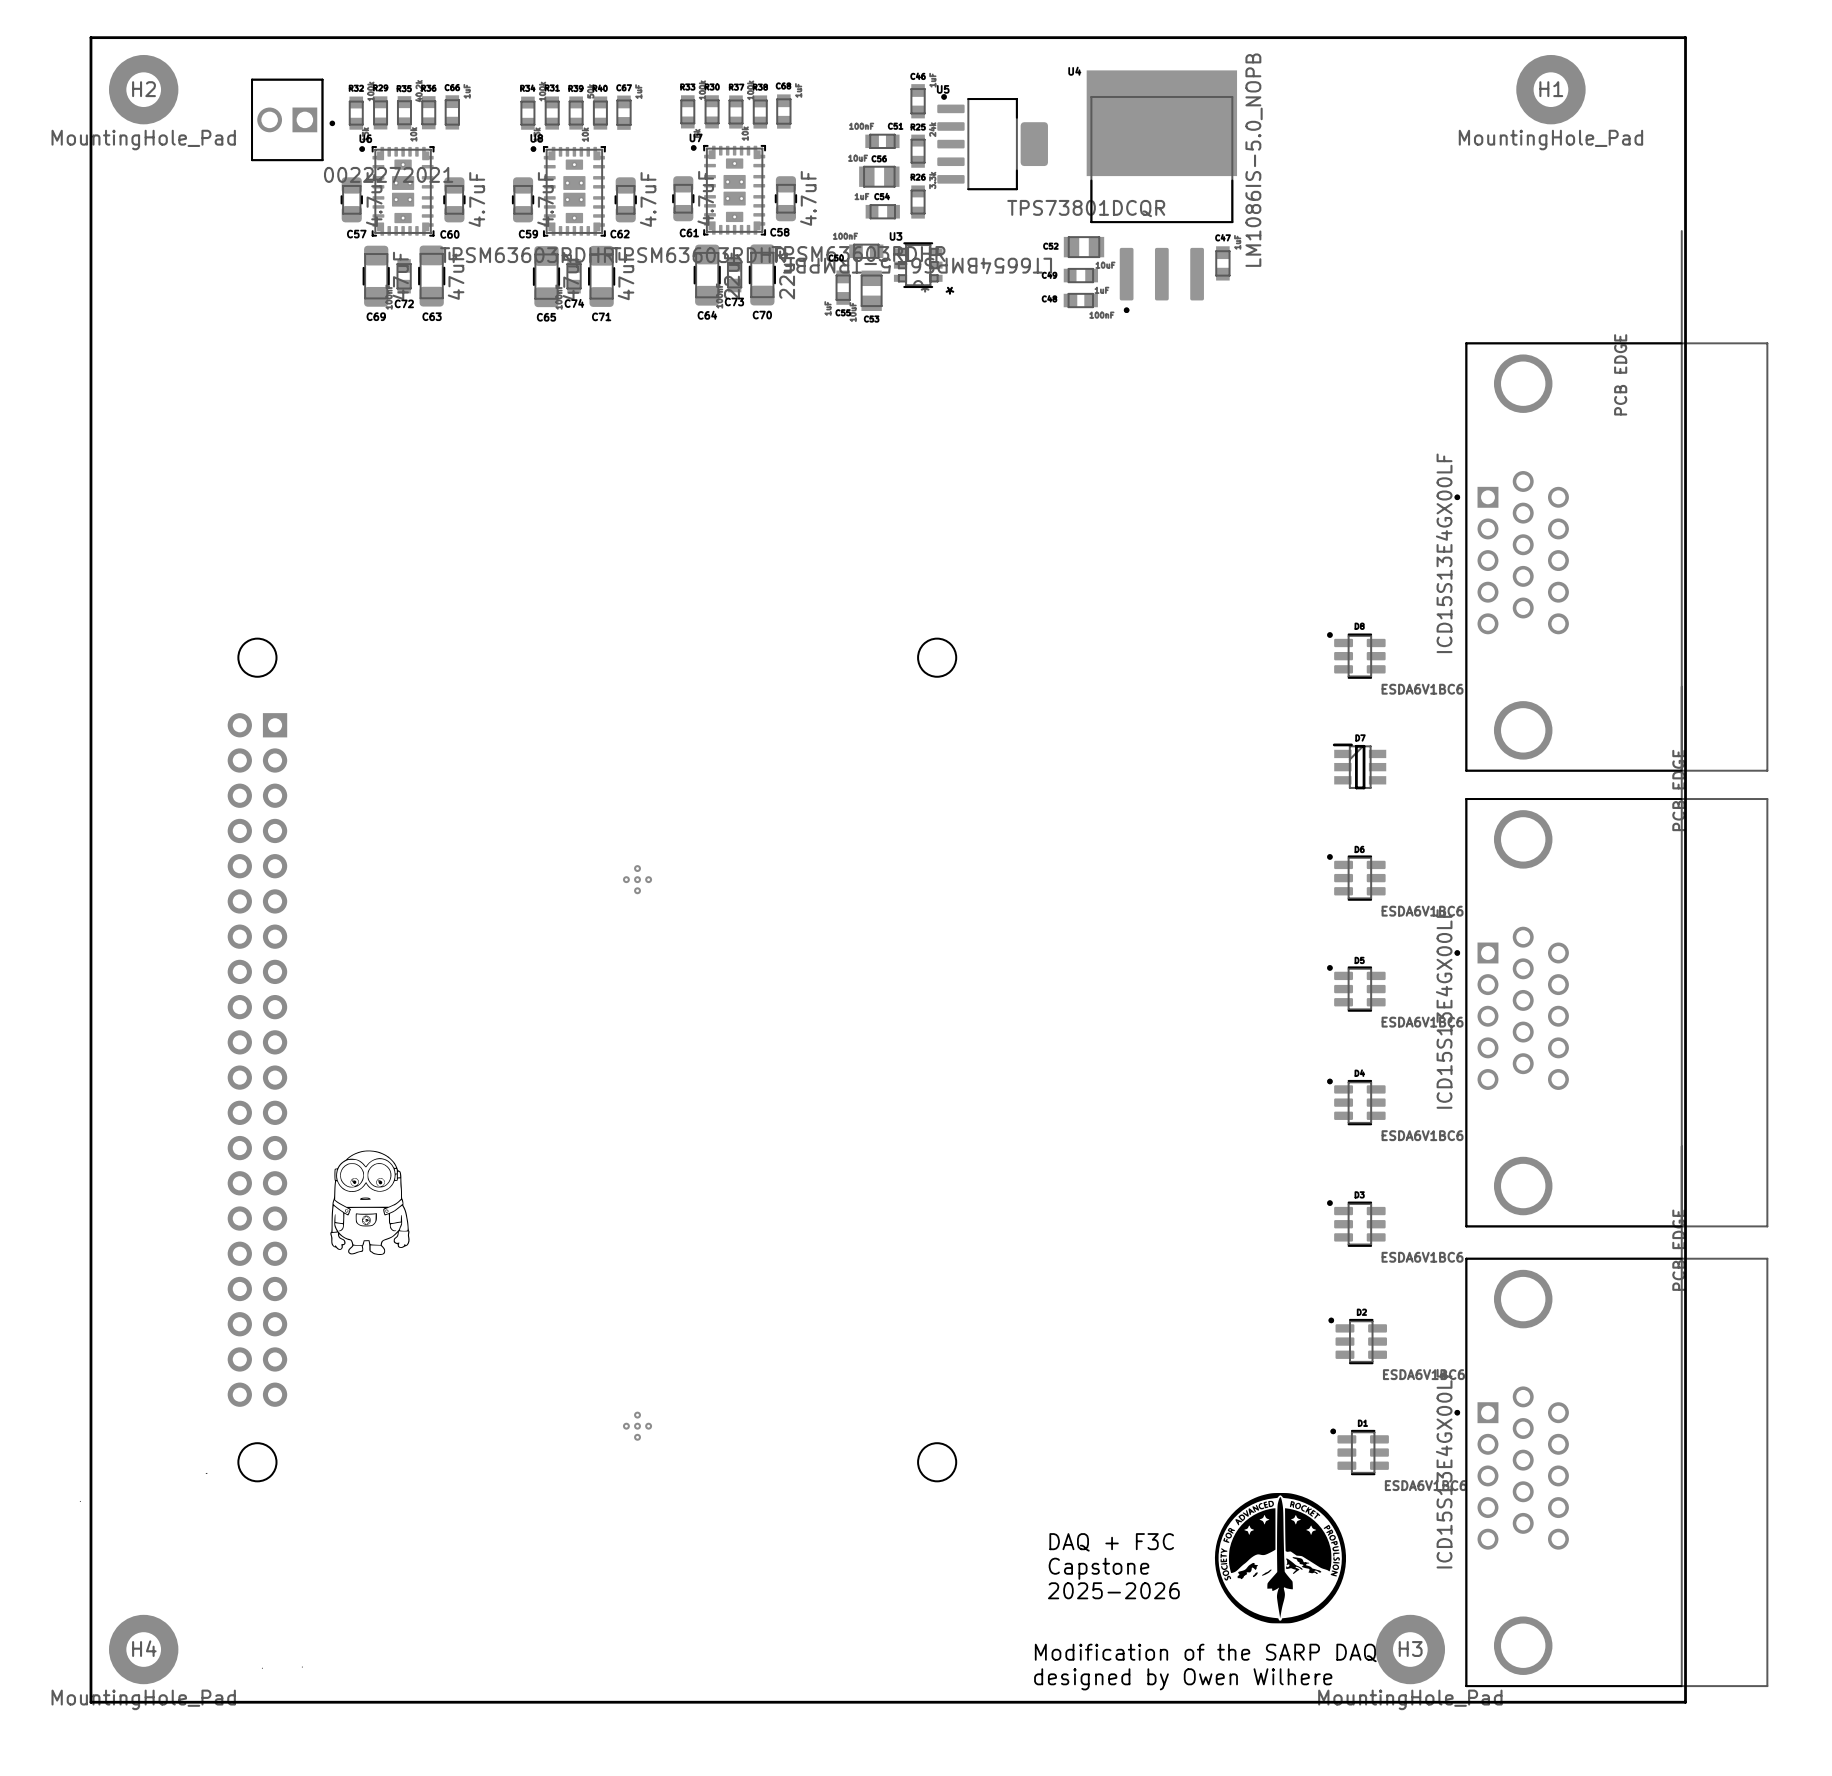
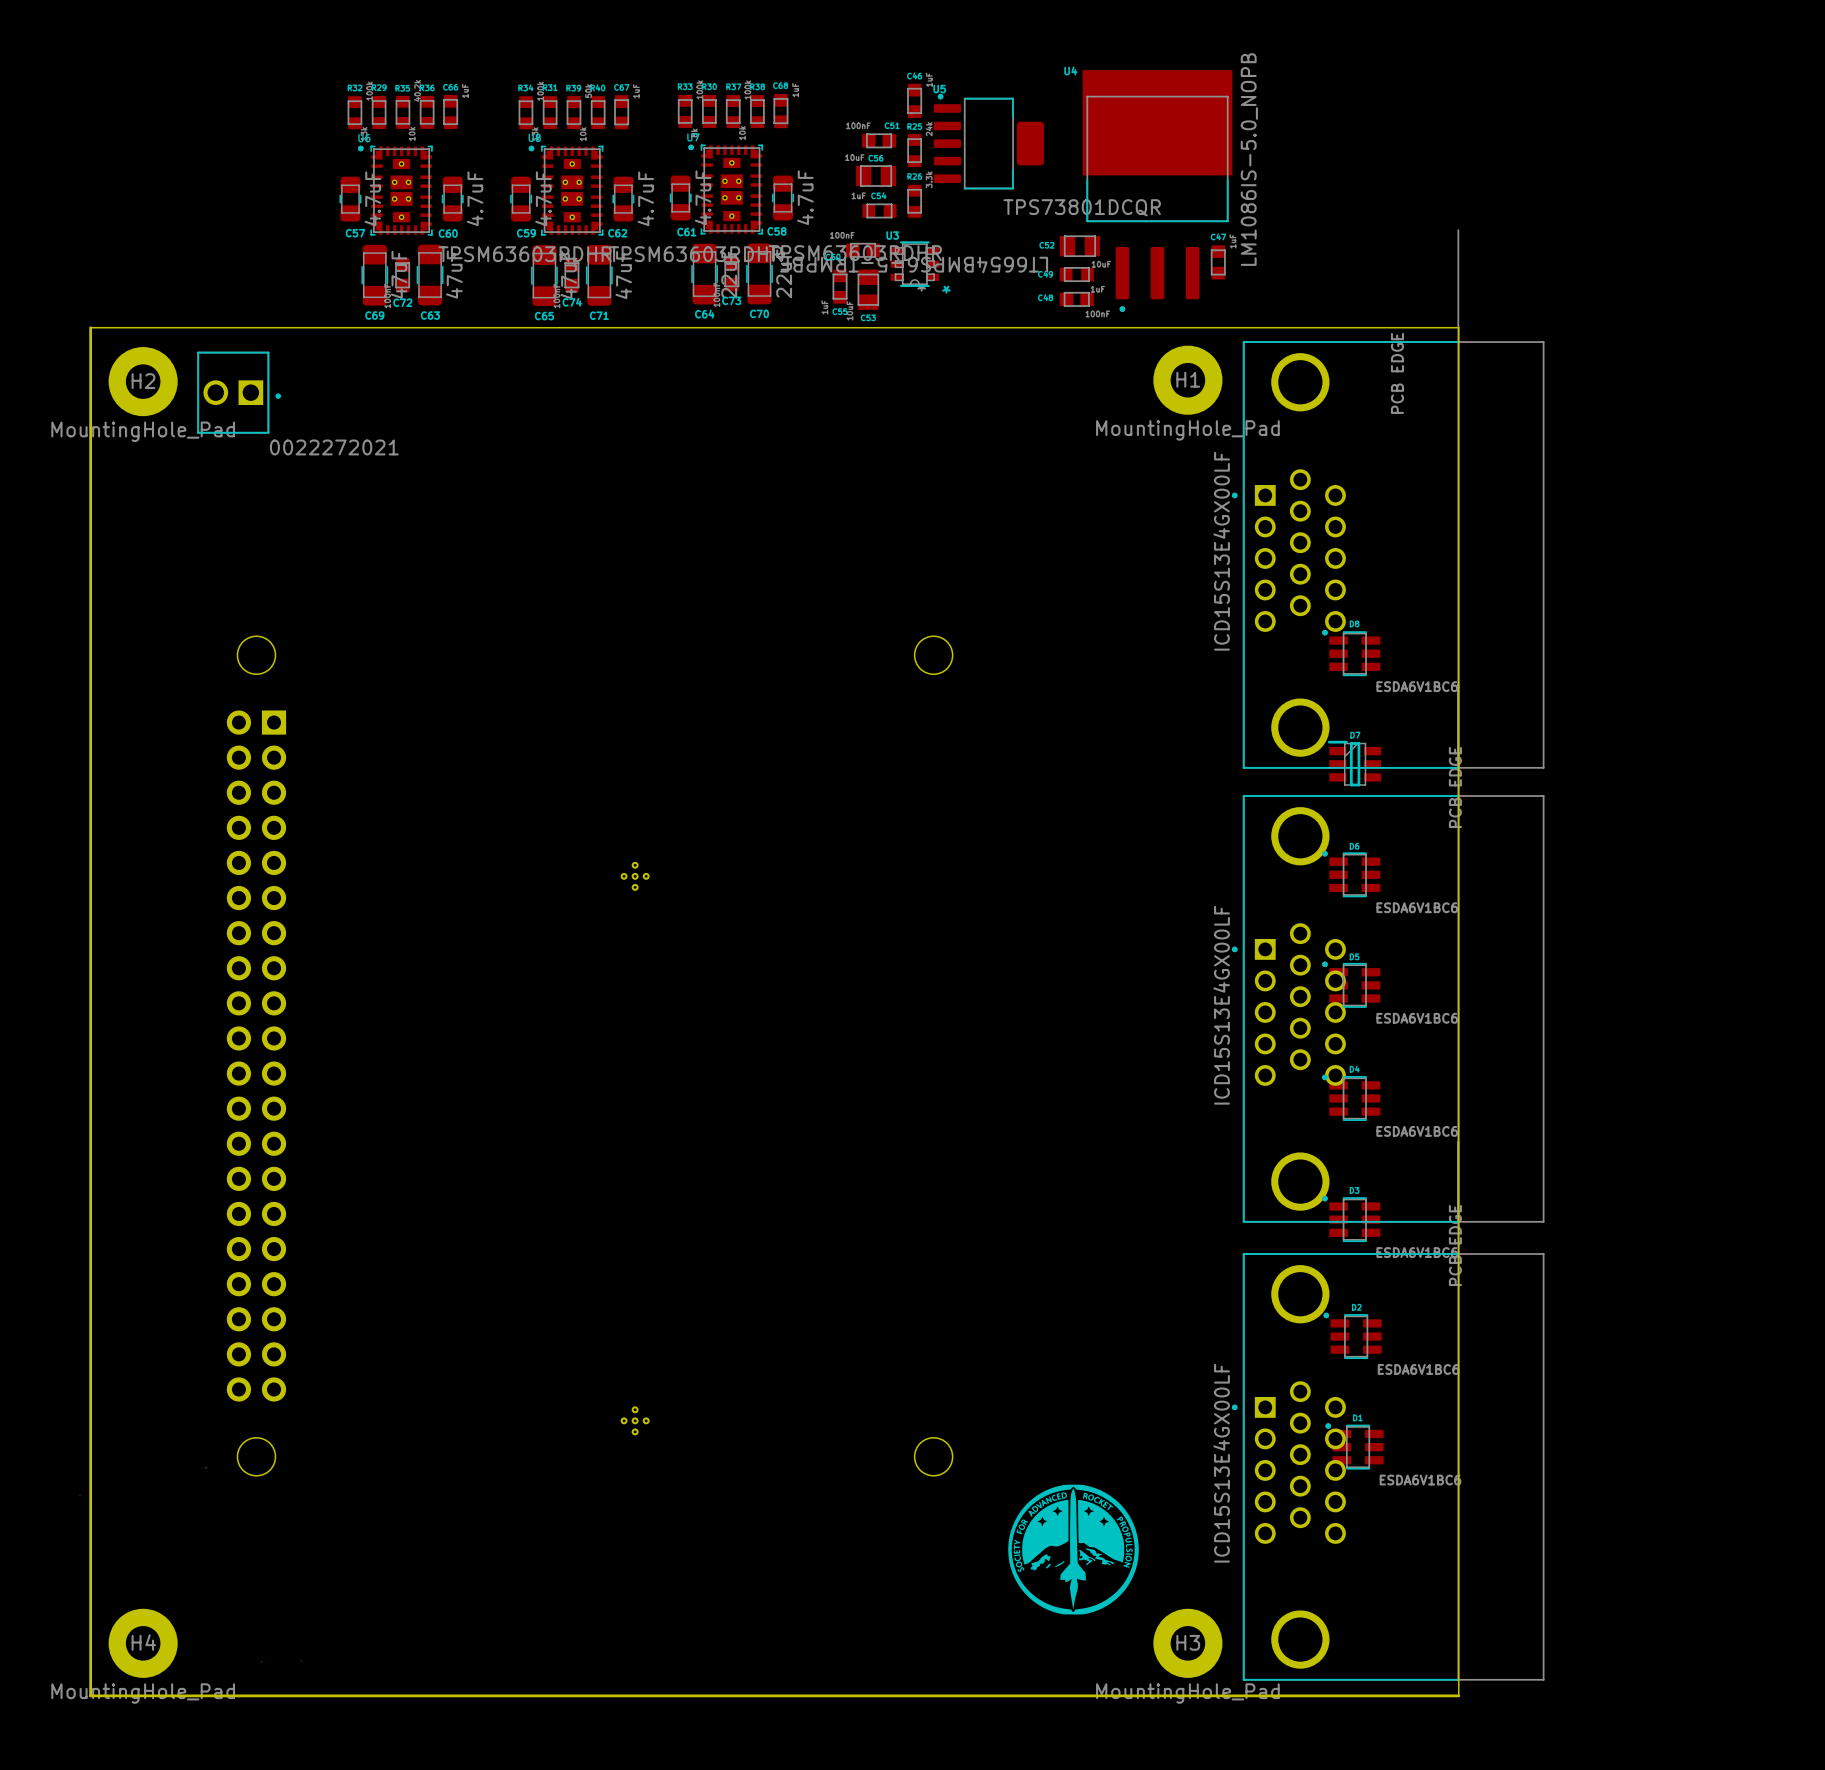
H2 position: (143, 89) -> (143, 381)
H1 position: (1550, 89) -> (1187, 380)
part position: (293, 119) -> (239, 392)
board edge: (90, 328) (90, 37) (1685, 37) (1685, 1702) (1464, 1702) -> (90, 327) (1458, 327) (1458, 1695)
part position: (1611, 500) -> (1388, 499)
part position: (1611, 956) -> (1388, 952)
drawing: [330, 1150, 410, 1256] -> none
part position: (1611, 1416) -> (1388, 1410)
text: DAQ + F3C (1111, 1542) -> none
drawing position: (1280, 1558) -> (1073, 1549)
text: Capstone (1098, 1568) -> none
text: 2025-2026 (1113, 1590) -> none
H3 position: (1410, 1649) -> (1187, 1643)
text: Modification of the SARP DAQ (1205, 1652) -> none
text: designed by Owen Wilhere (1183, 1679) -> none

